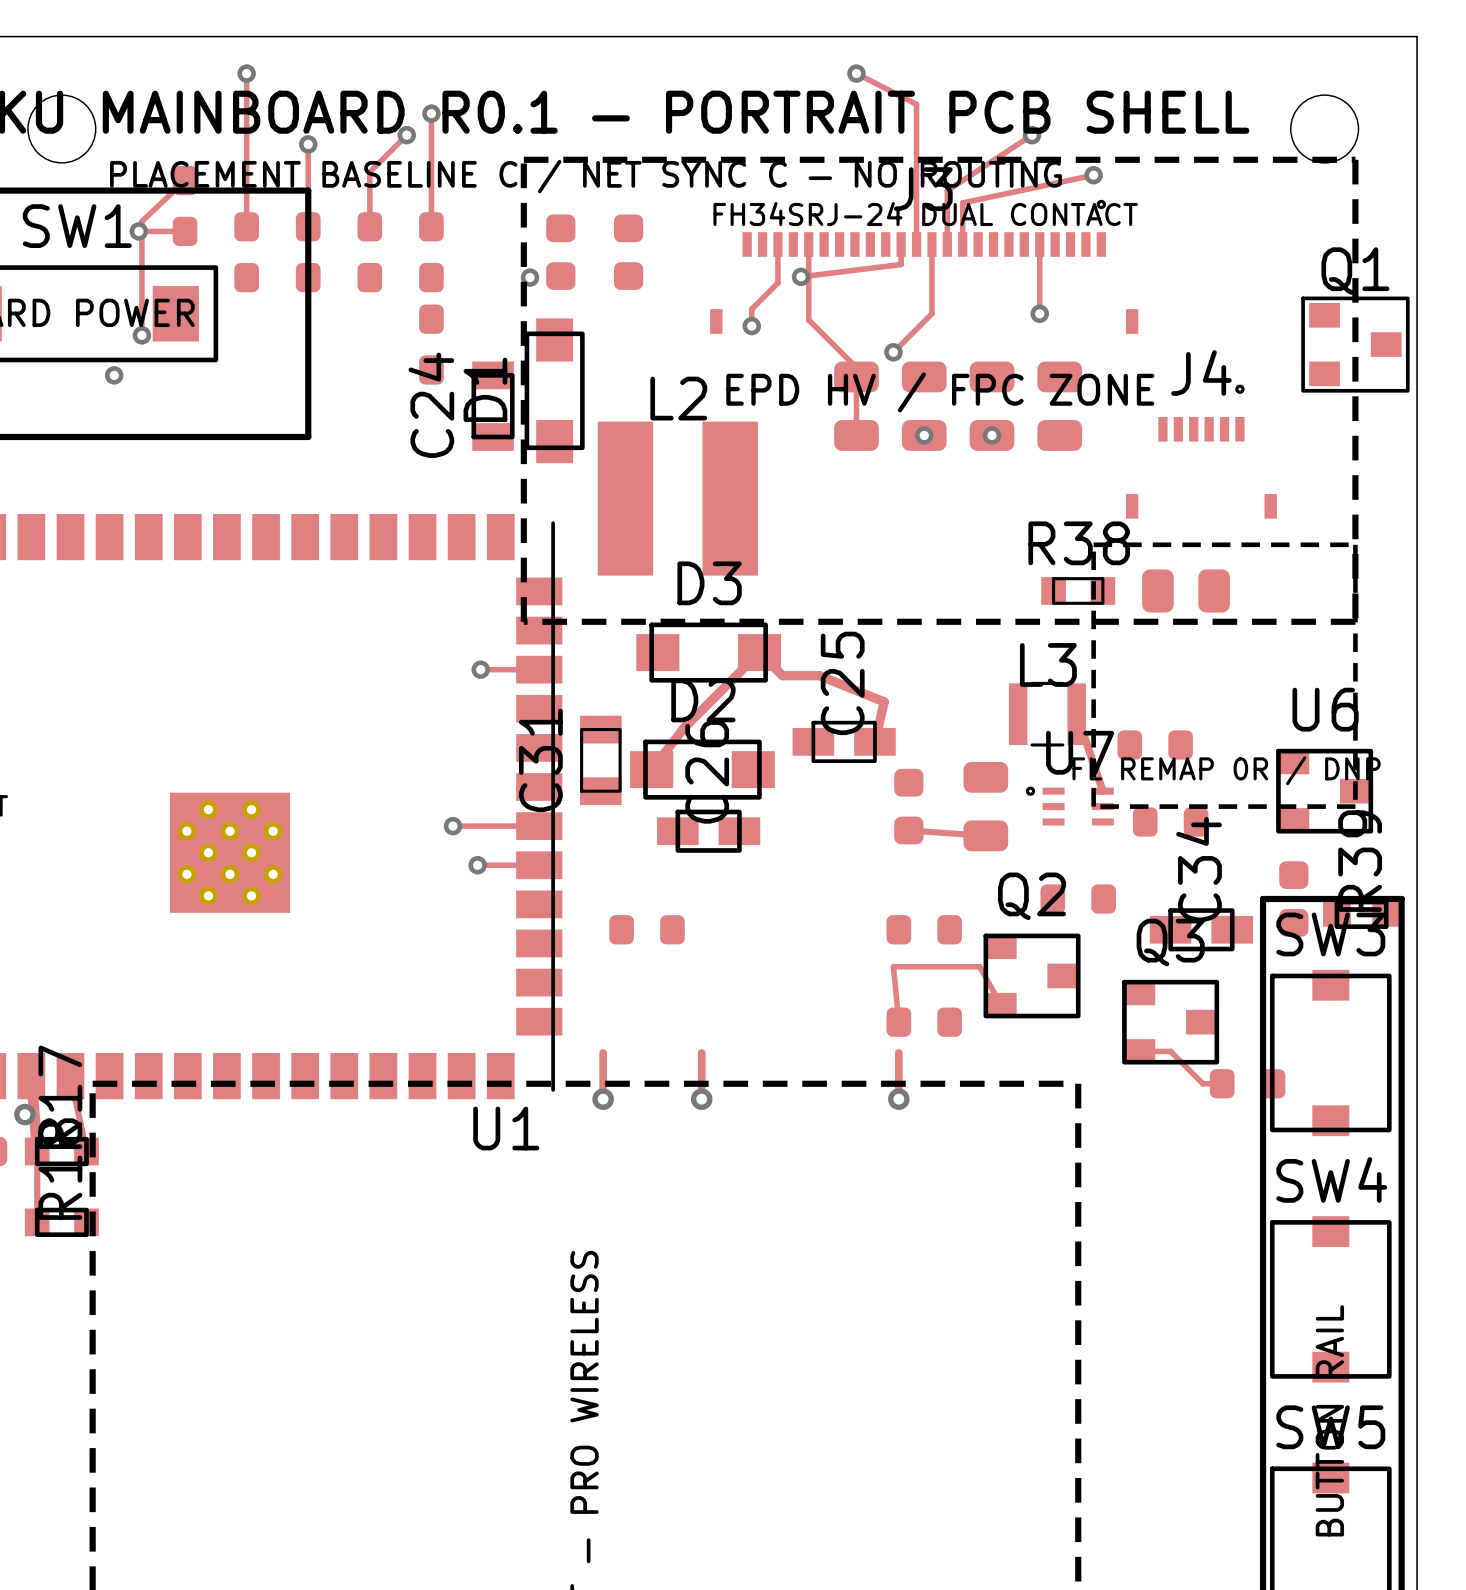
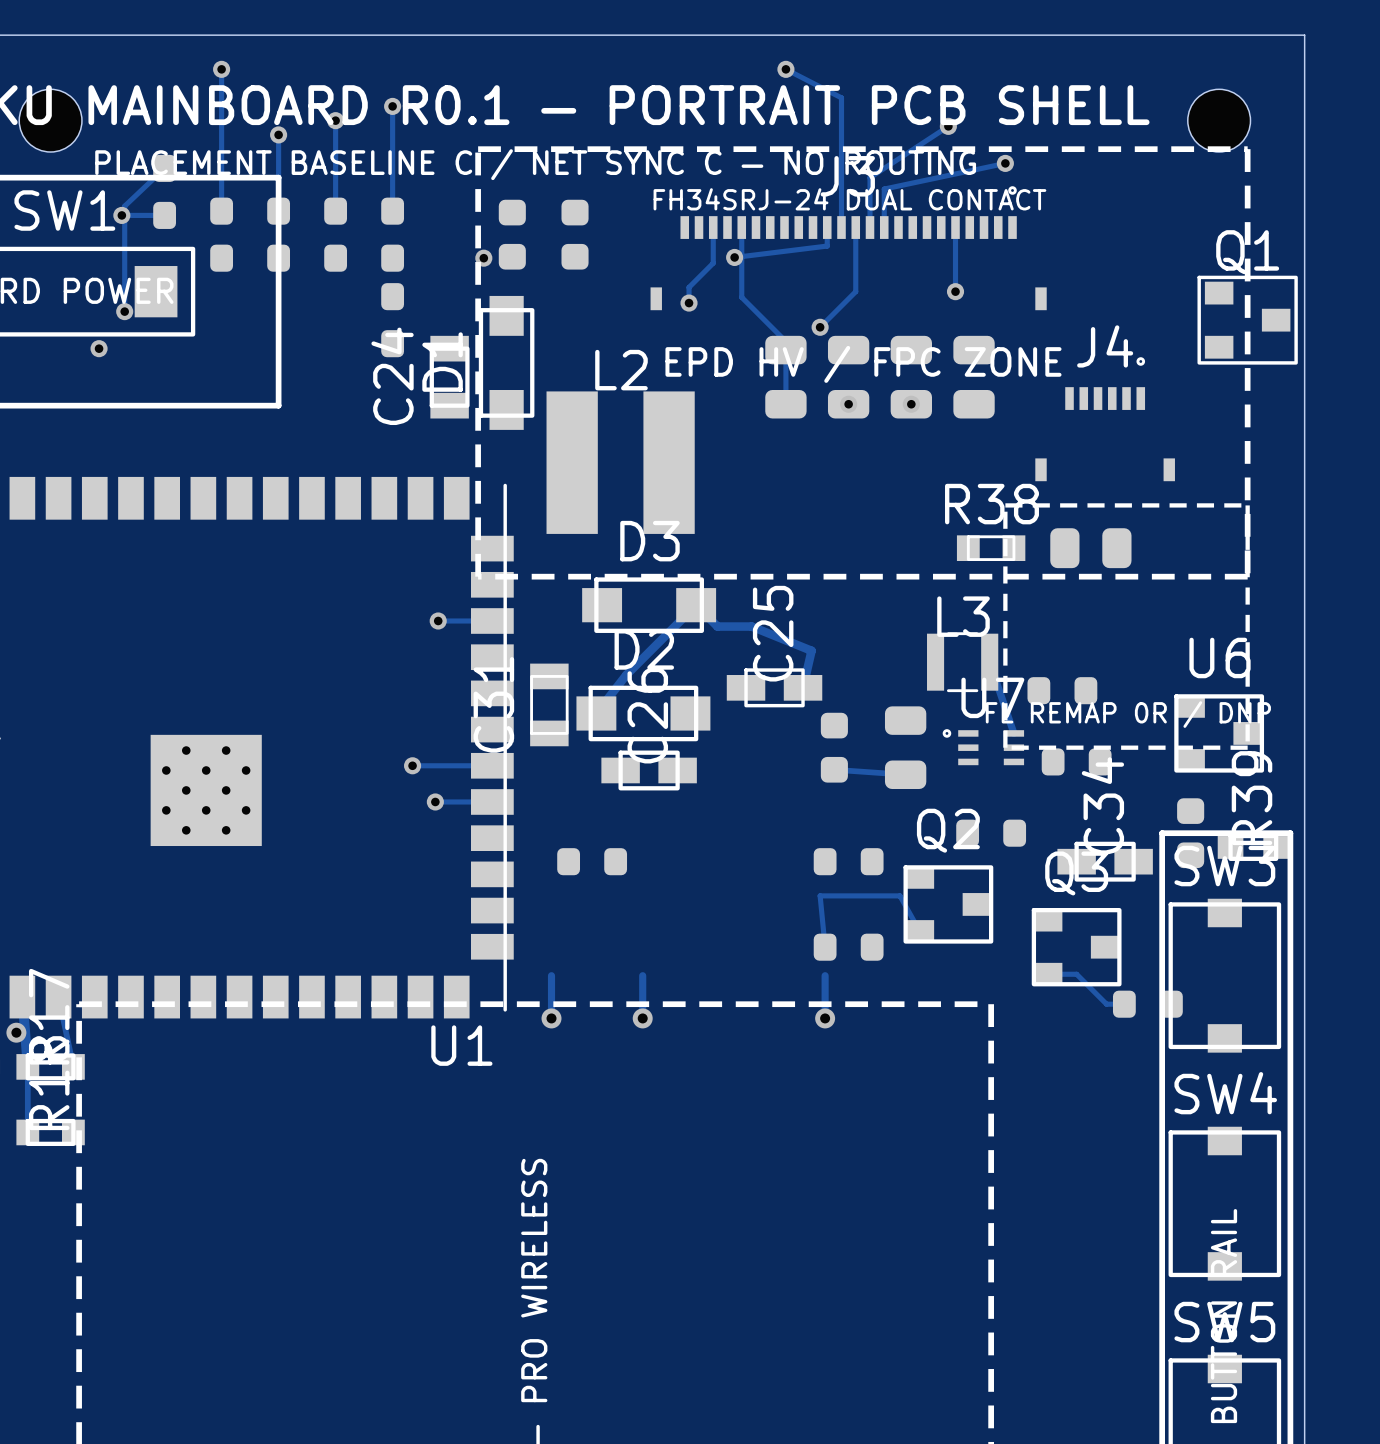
track: (406, 135) (369, 172) -> (335, 120) (335, 160)
via position: (406, 135) -> (335, 120)

